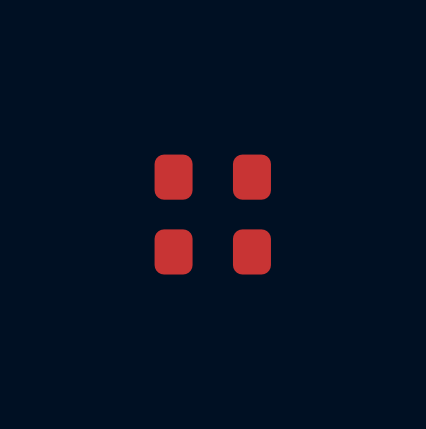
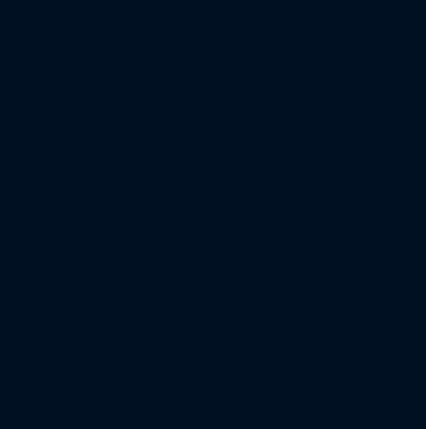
part: (212, 177) -> none
part: (212, 251) -> none

